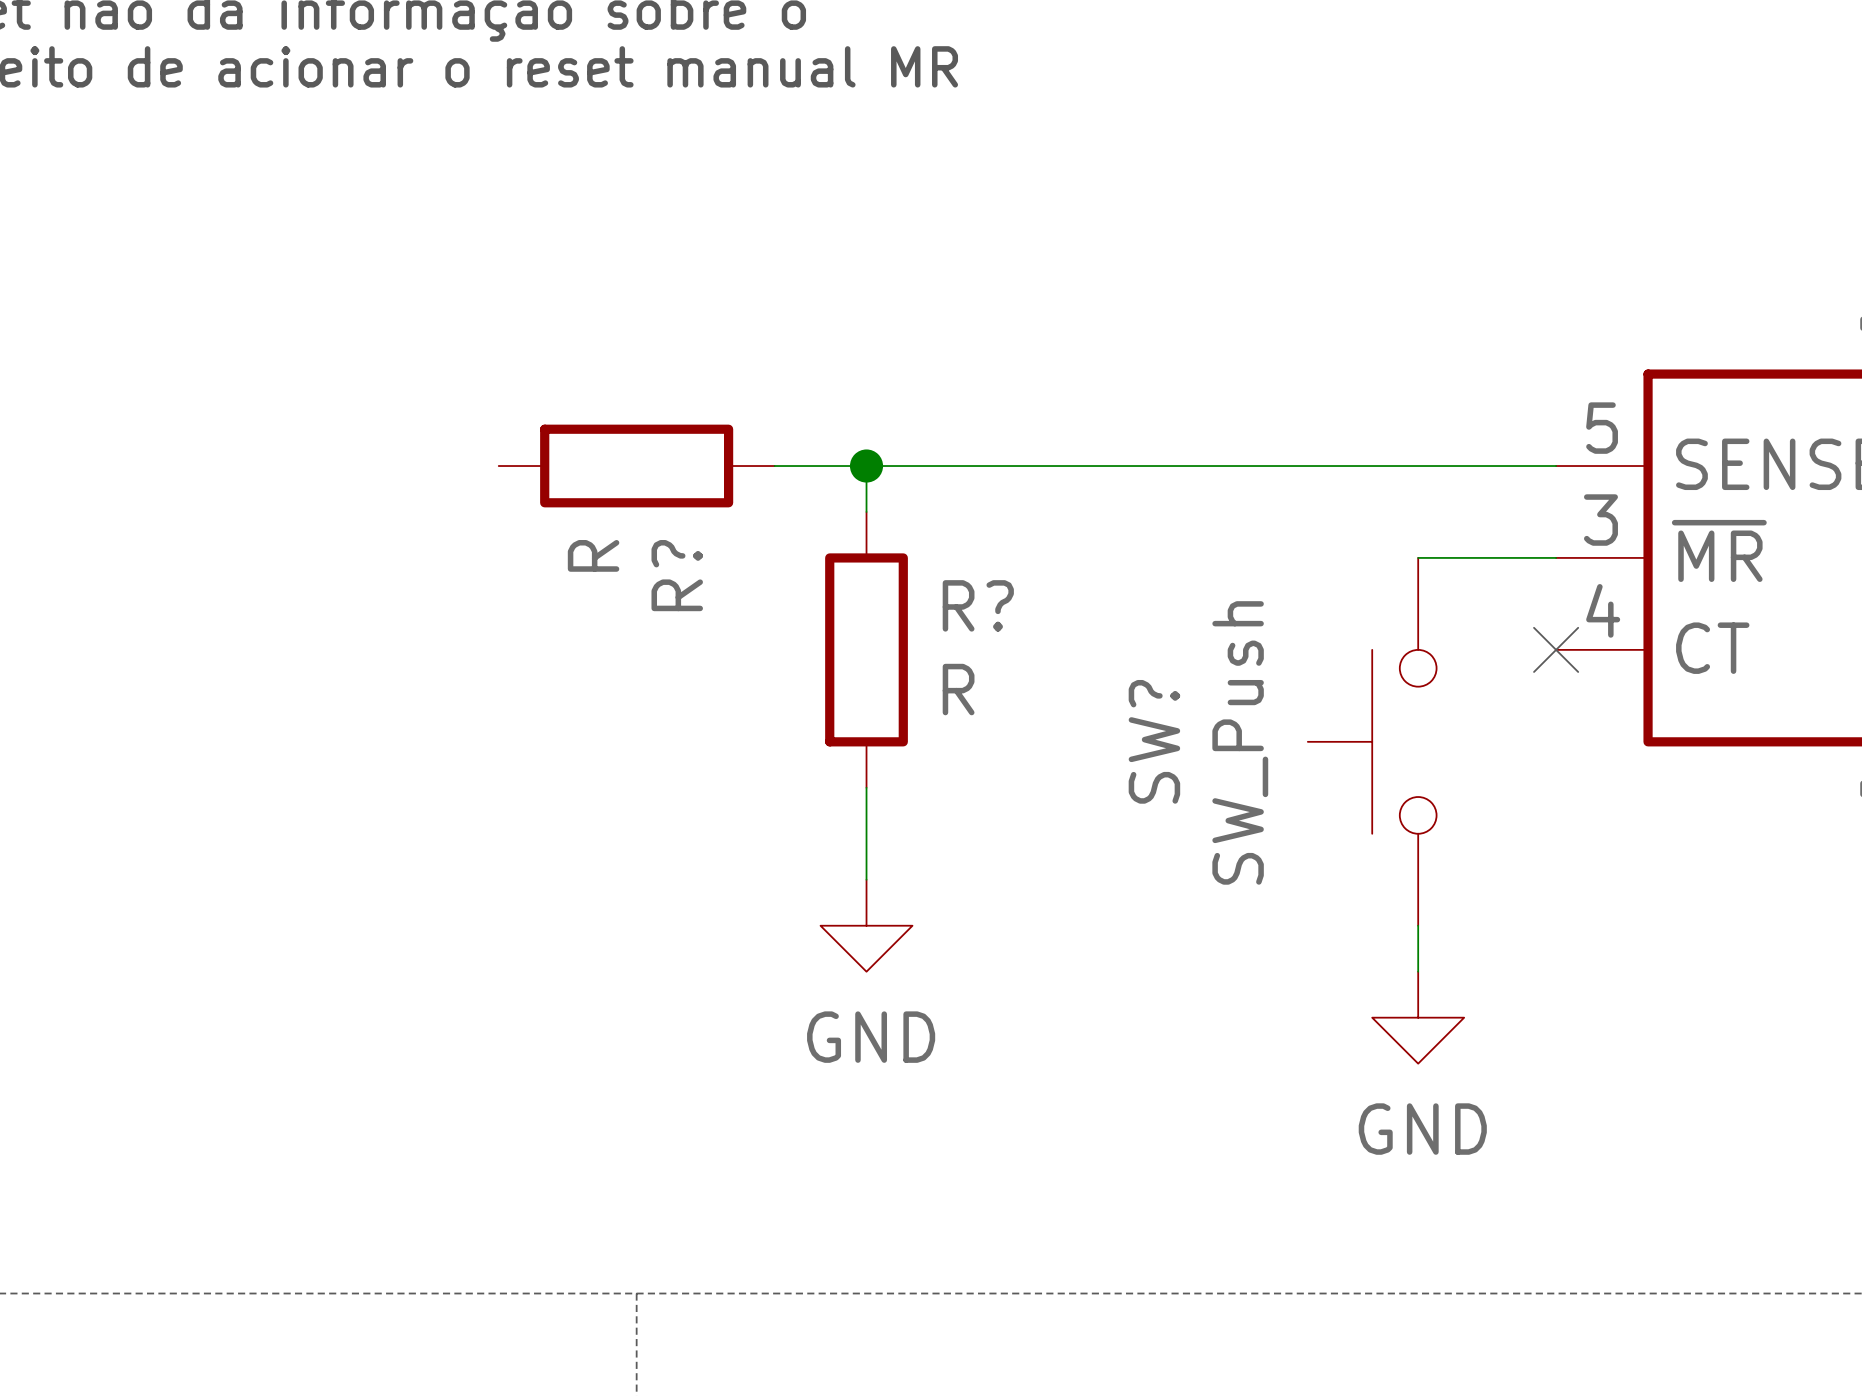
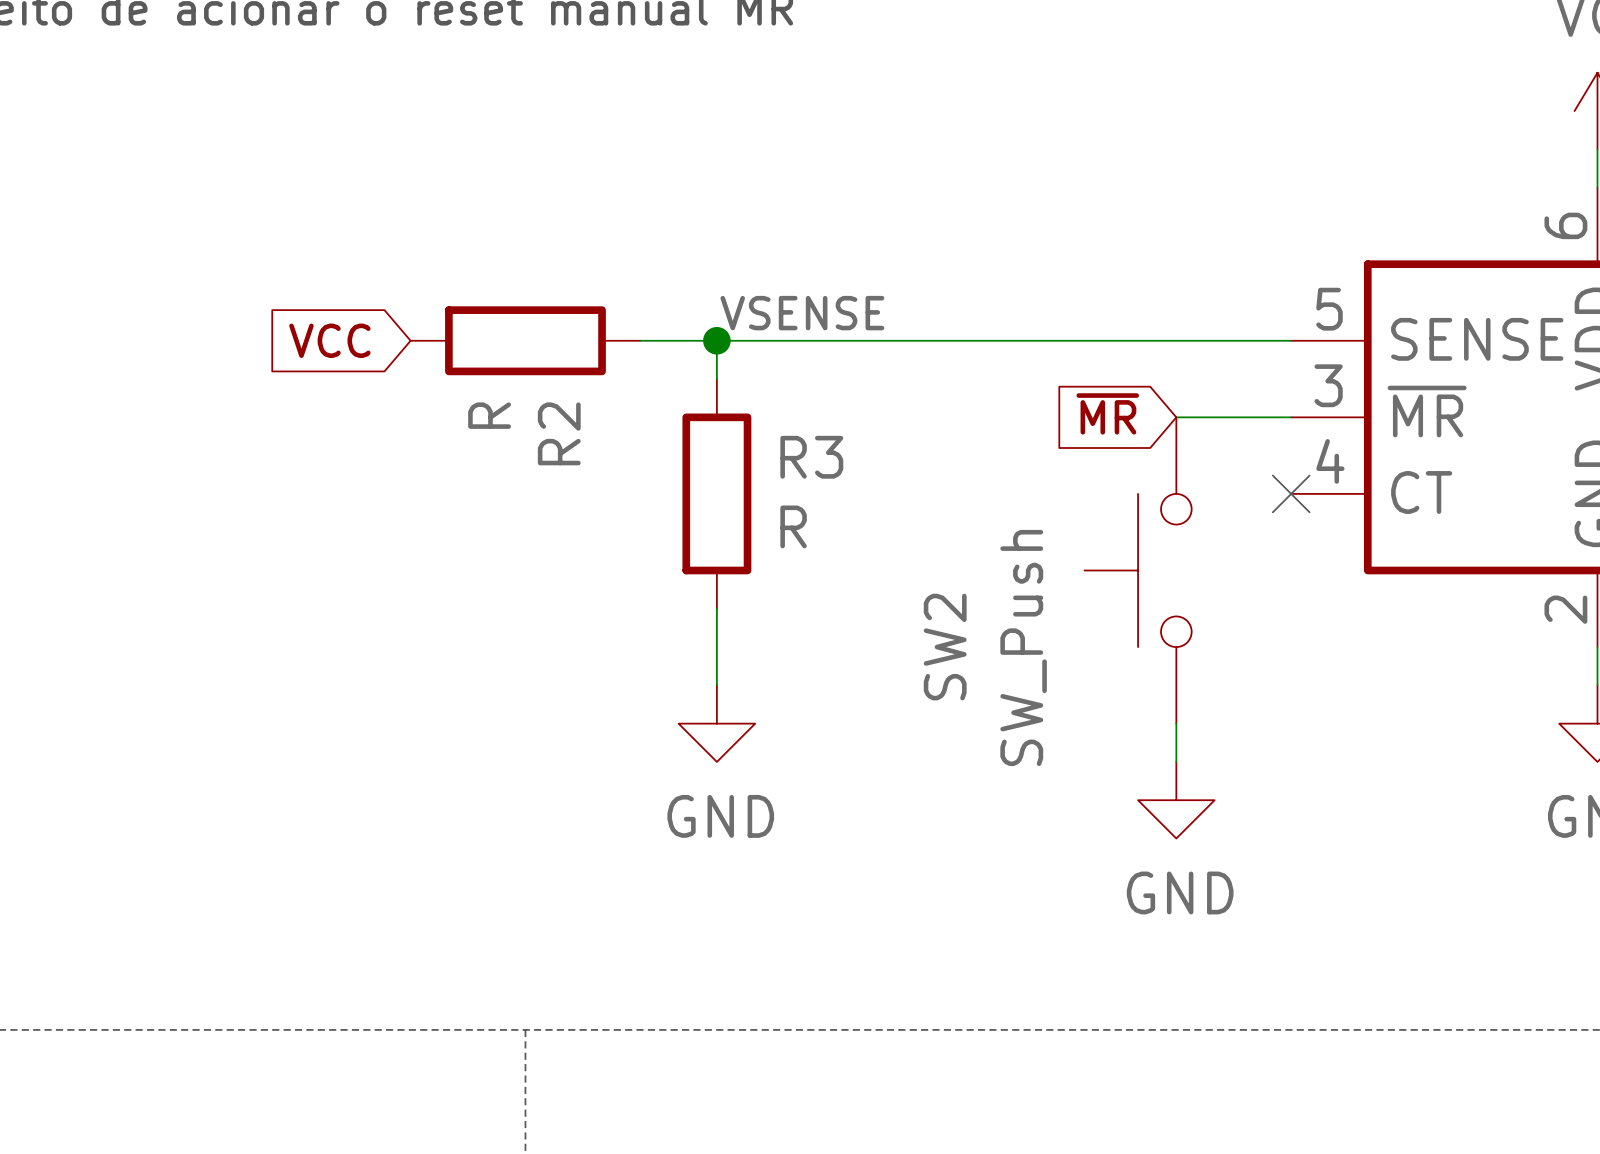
label: none -> VSENSE (802, 313)
global label: none -> VCC (329, 340)
global label: none -> ~{MR} (1107, 413)
R? name: R? (677, 575) -> R2 (559, 433)
R? name: R? (978, 605) -> R3 (811, 457)
SW? name: SW? (1154, 741) -> SW2 (945, 647)
SW? value position: SW_Push (1240, 742) -> SW_Push (1023, 647)

